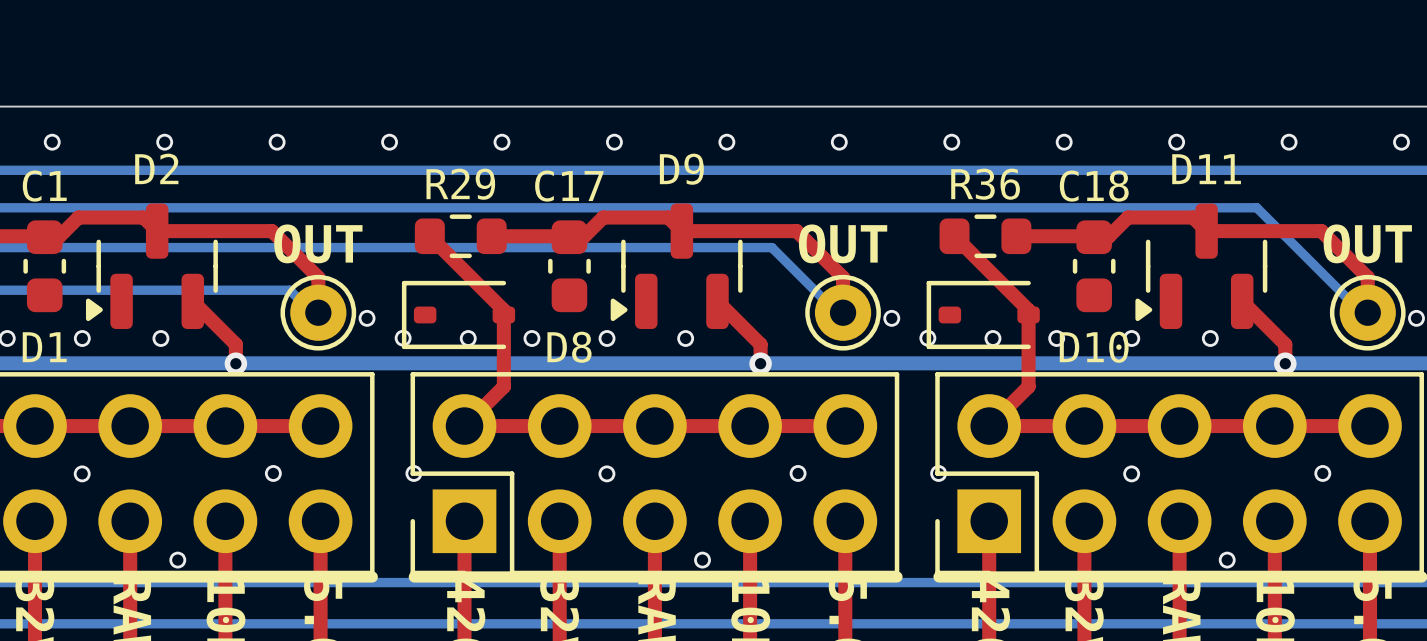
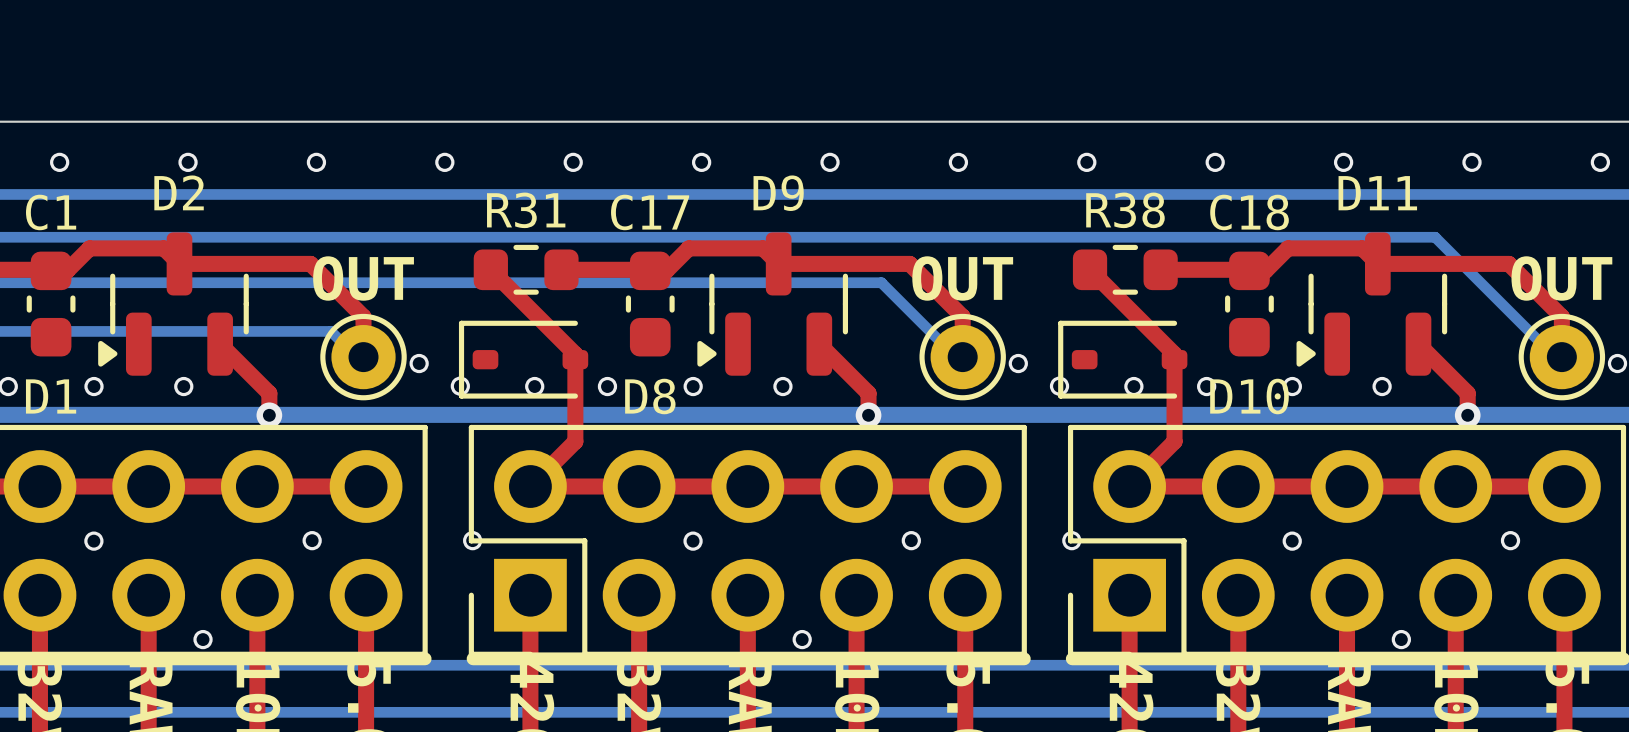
R29 name: R29 (460, 184) -> R31 (526, 210)
R36 name: R36 (985, 184) -> R38 (1125, 210)

